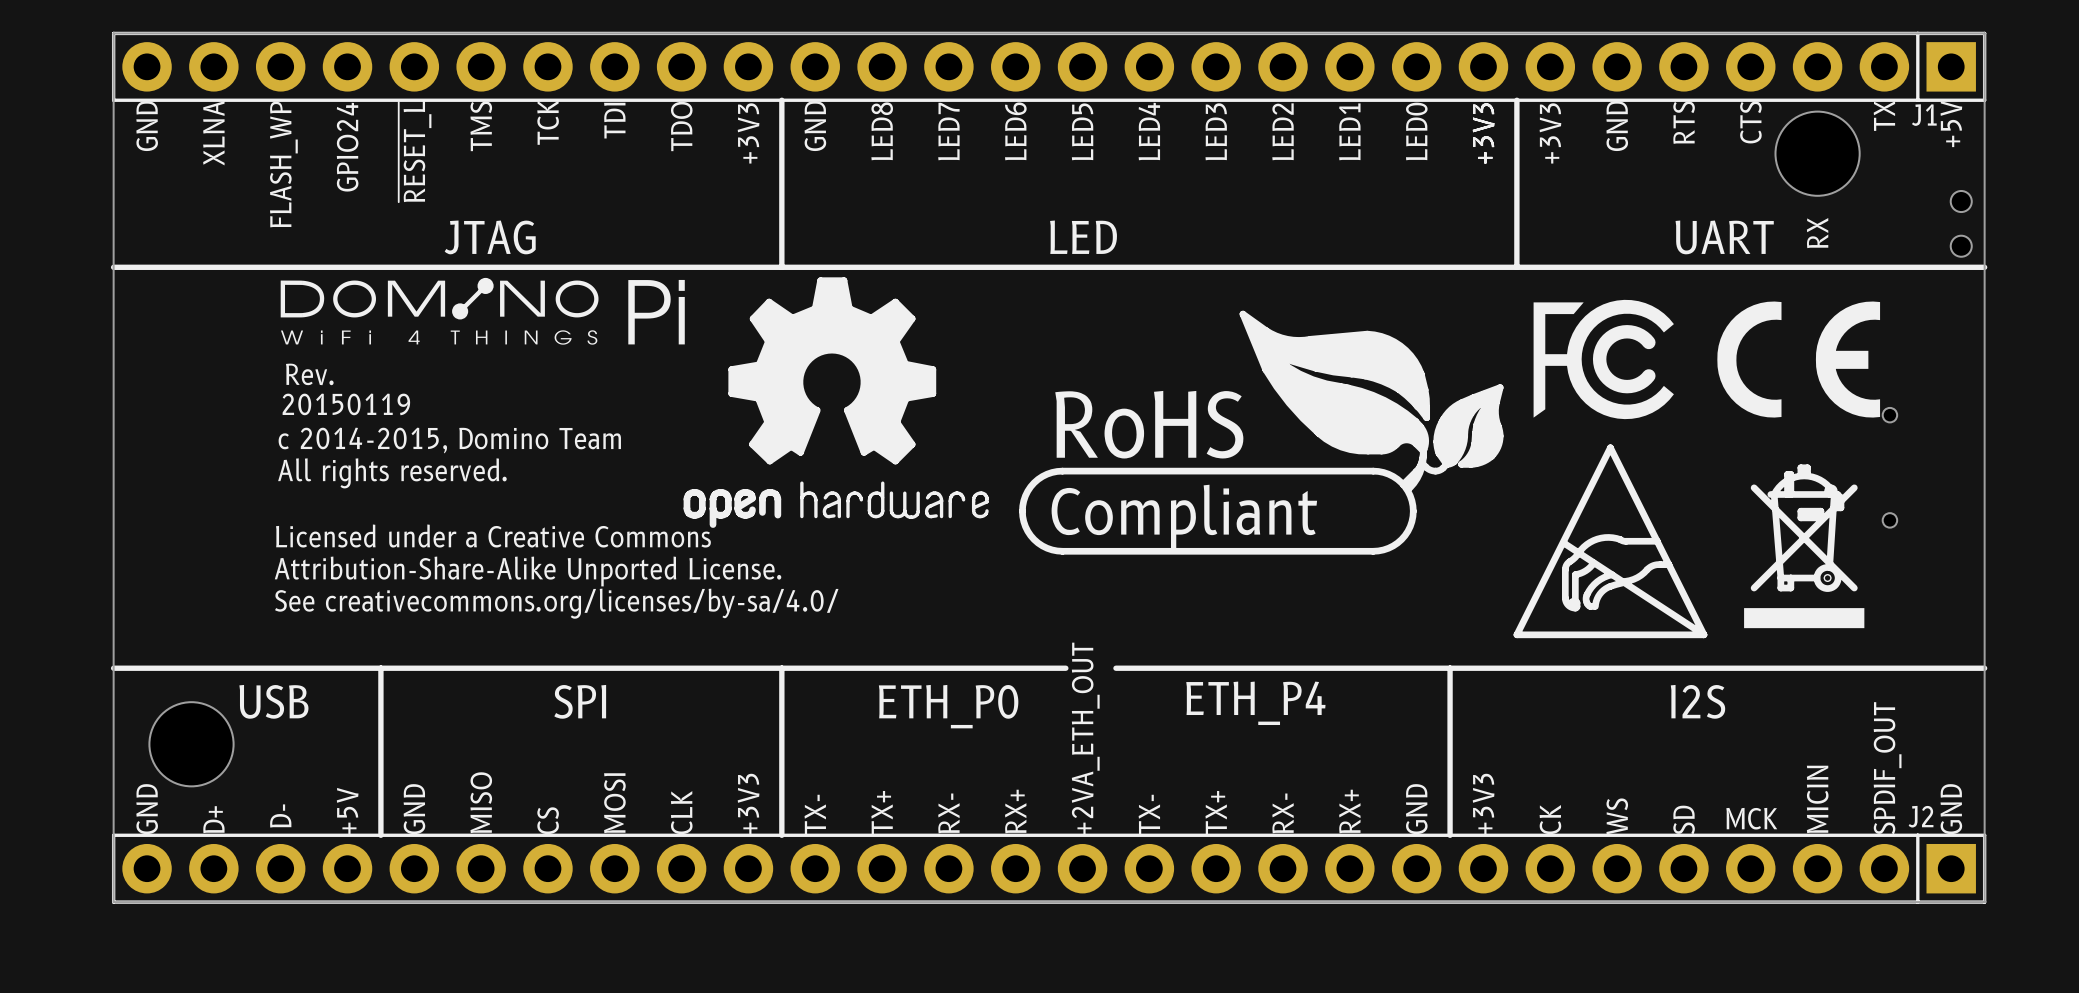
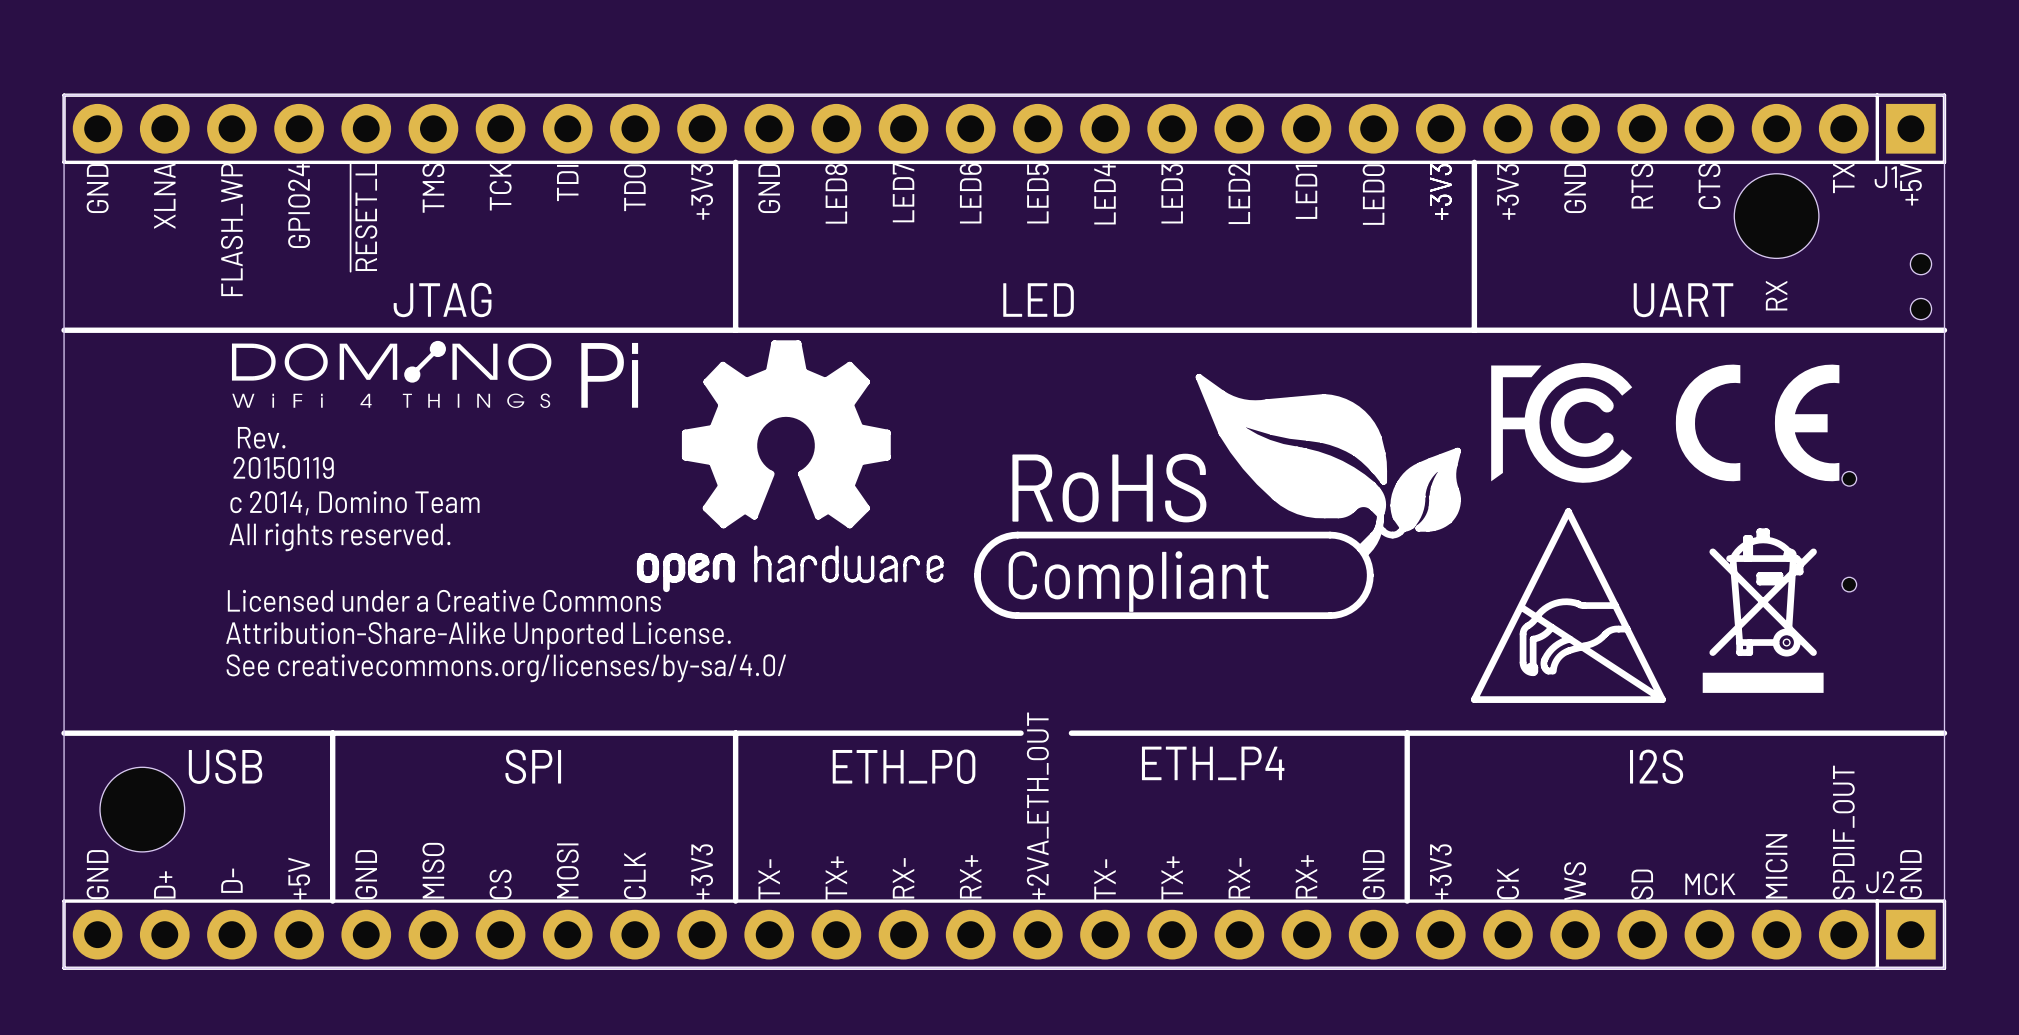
text: c 2014-2015, Domino Team (449, 440) -> c 2014, Domino Team (354, 503)

